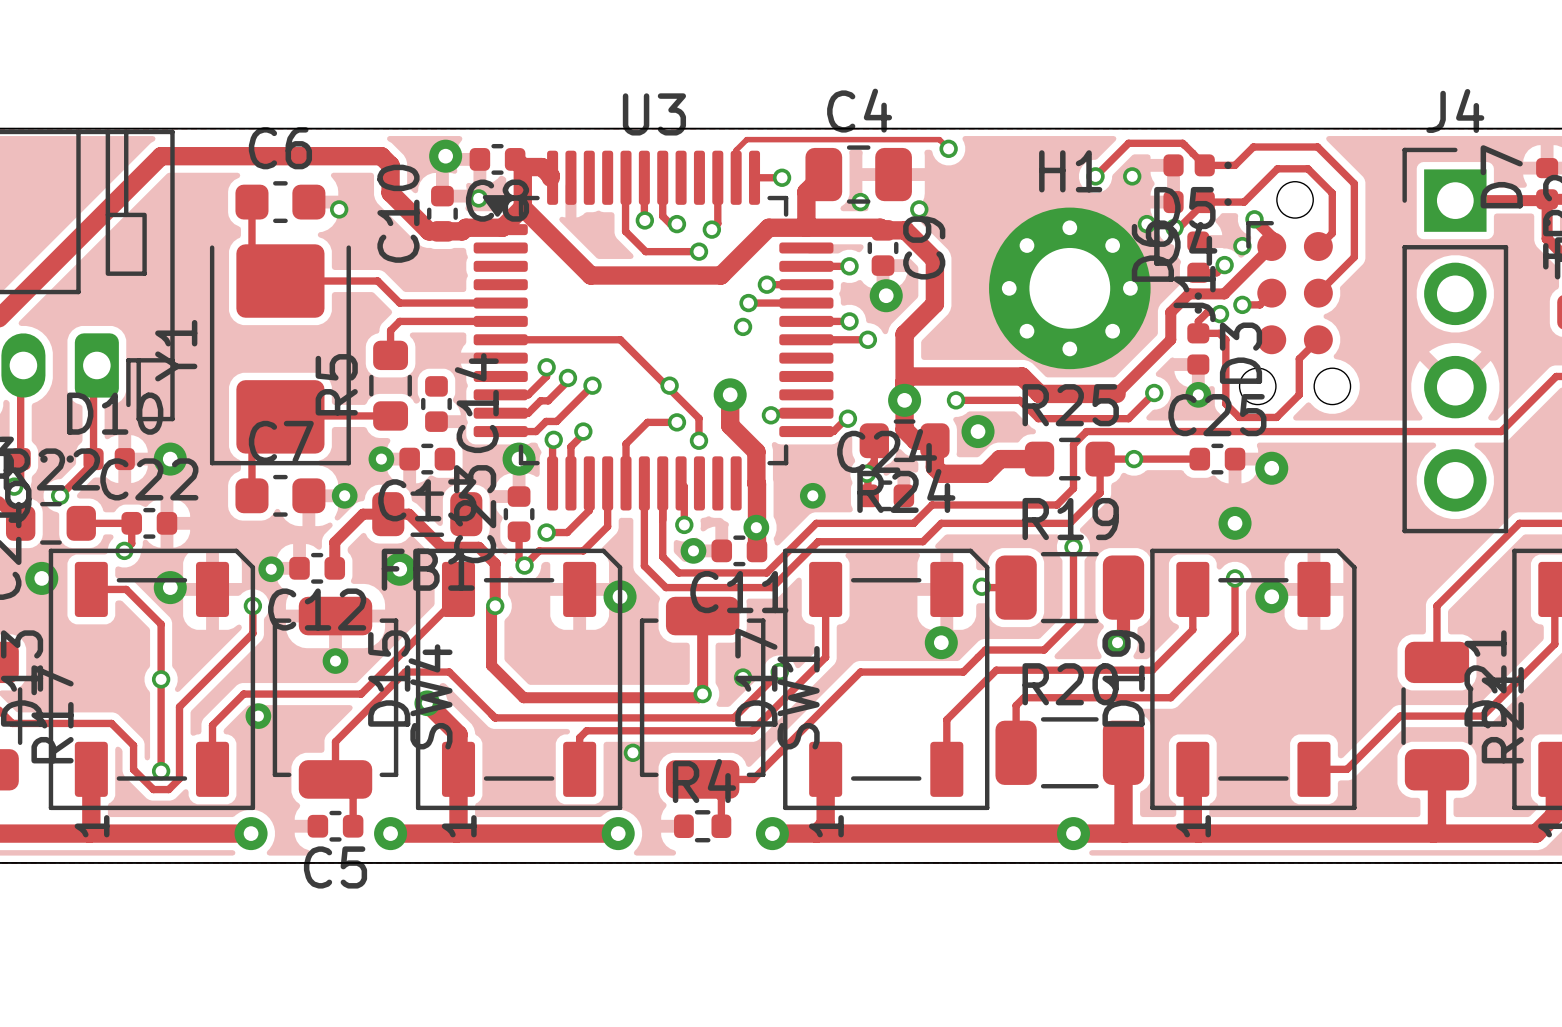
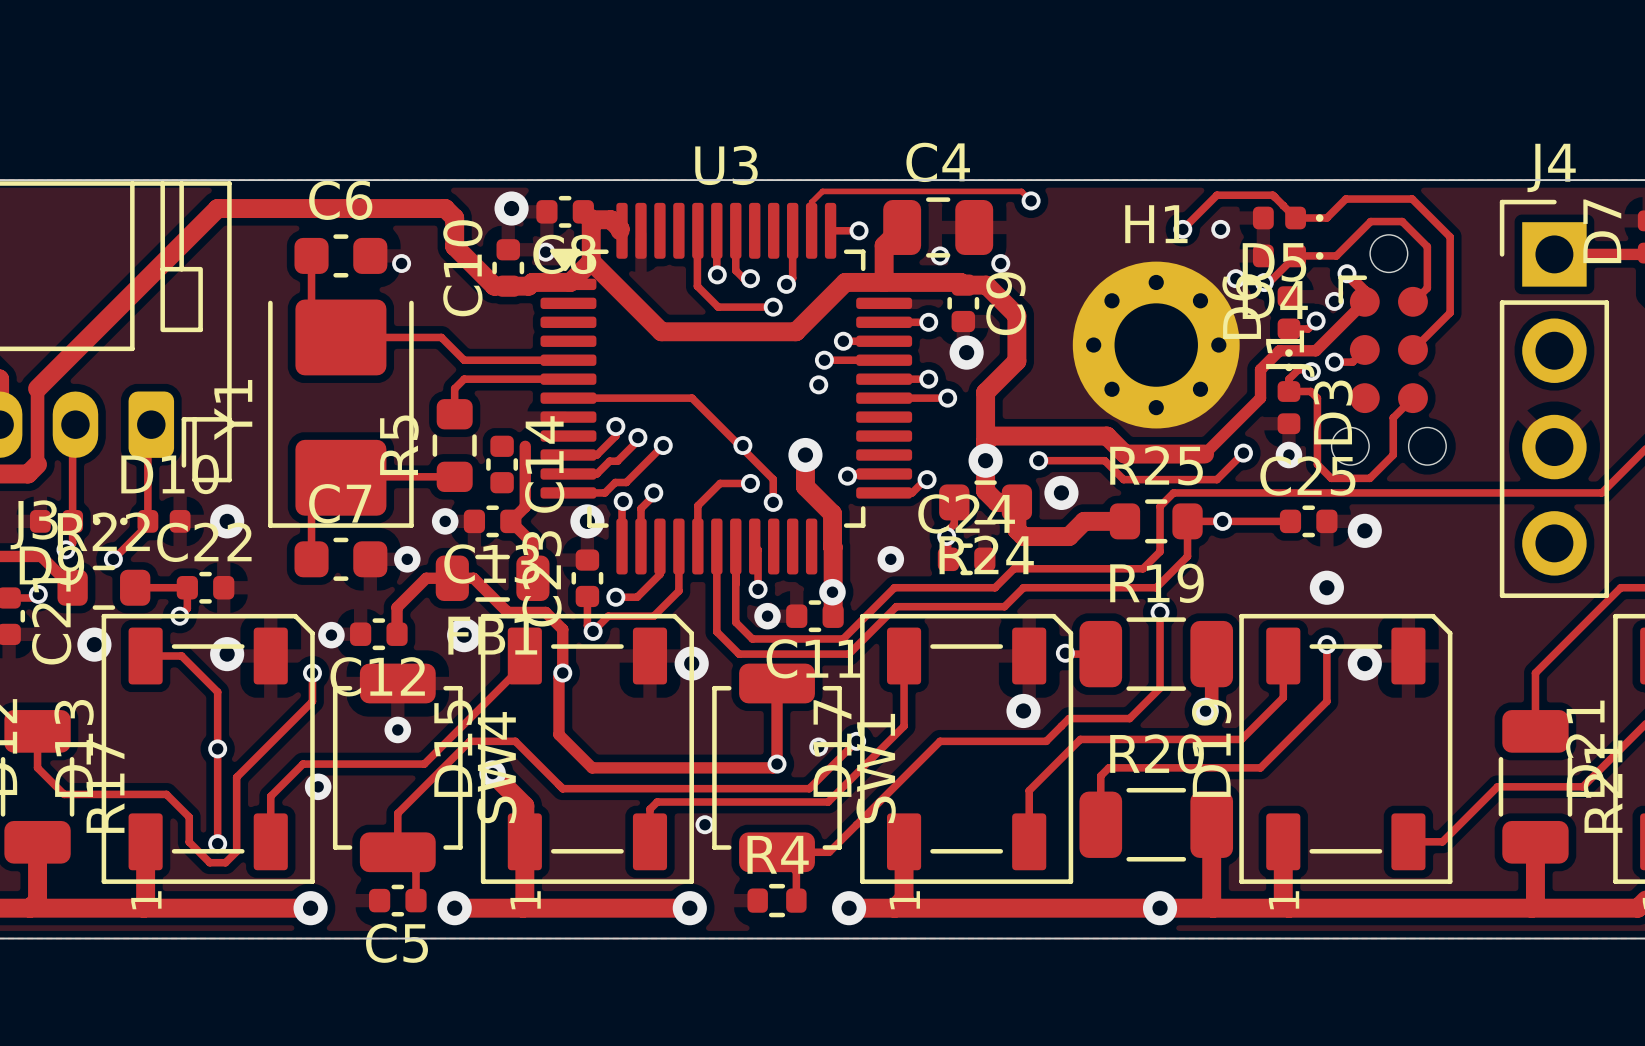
track: none -> (525, 446) (525, 506) (510, 521) (532, 543) (532, 578)

